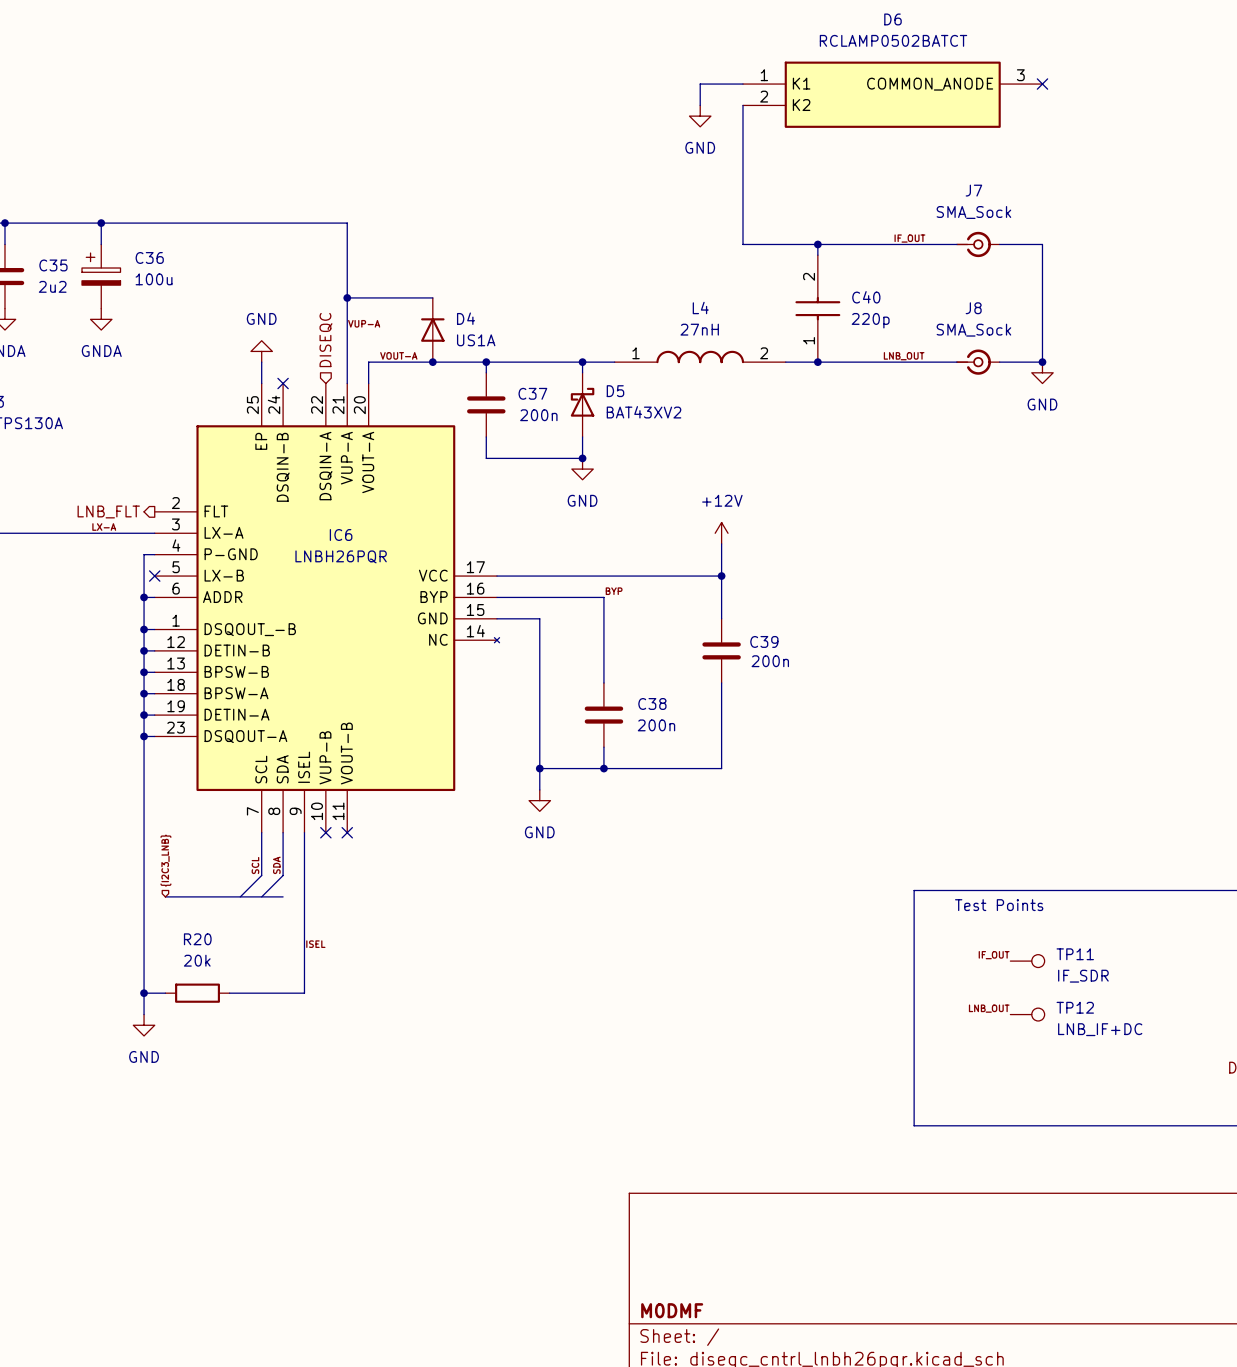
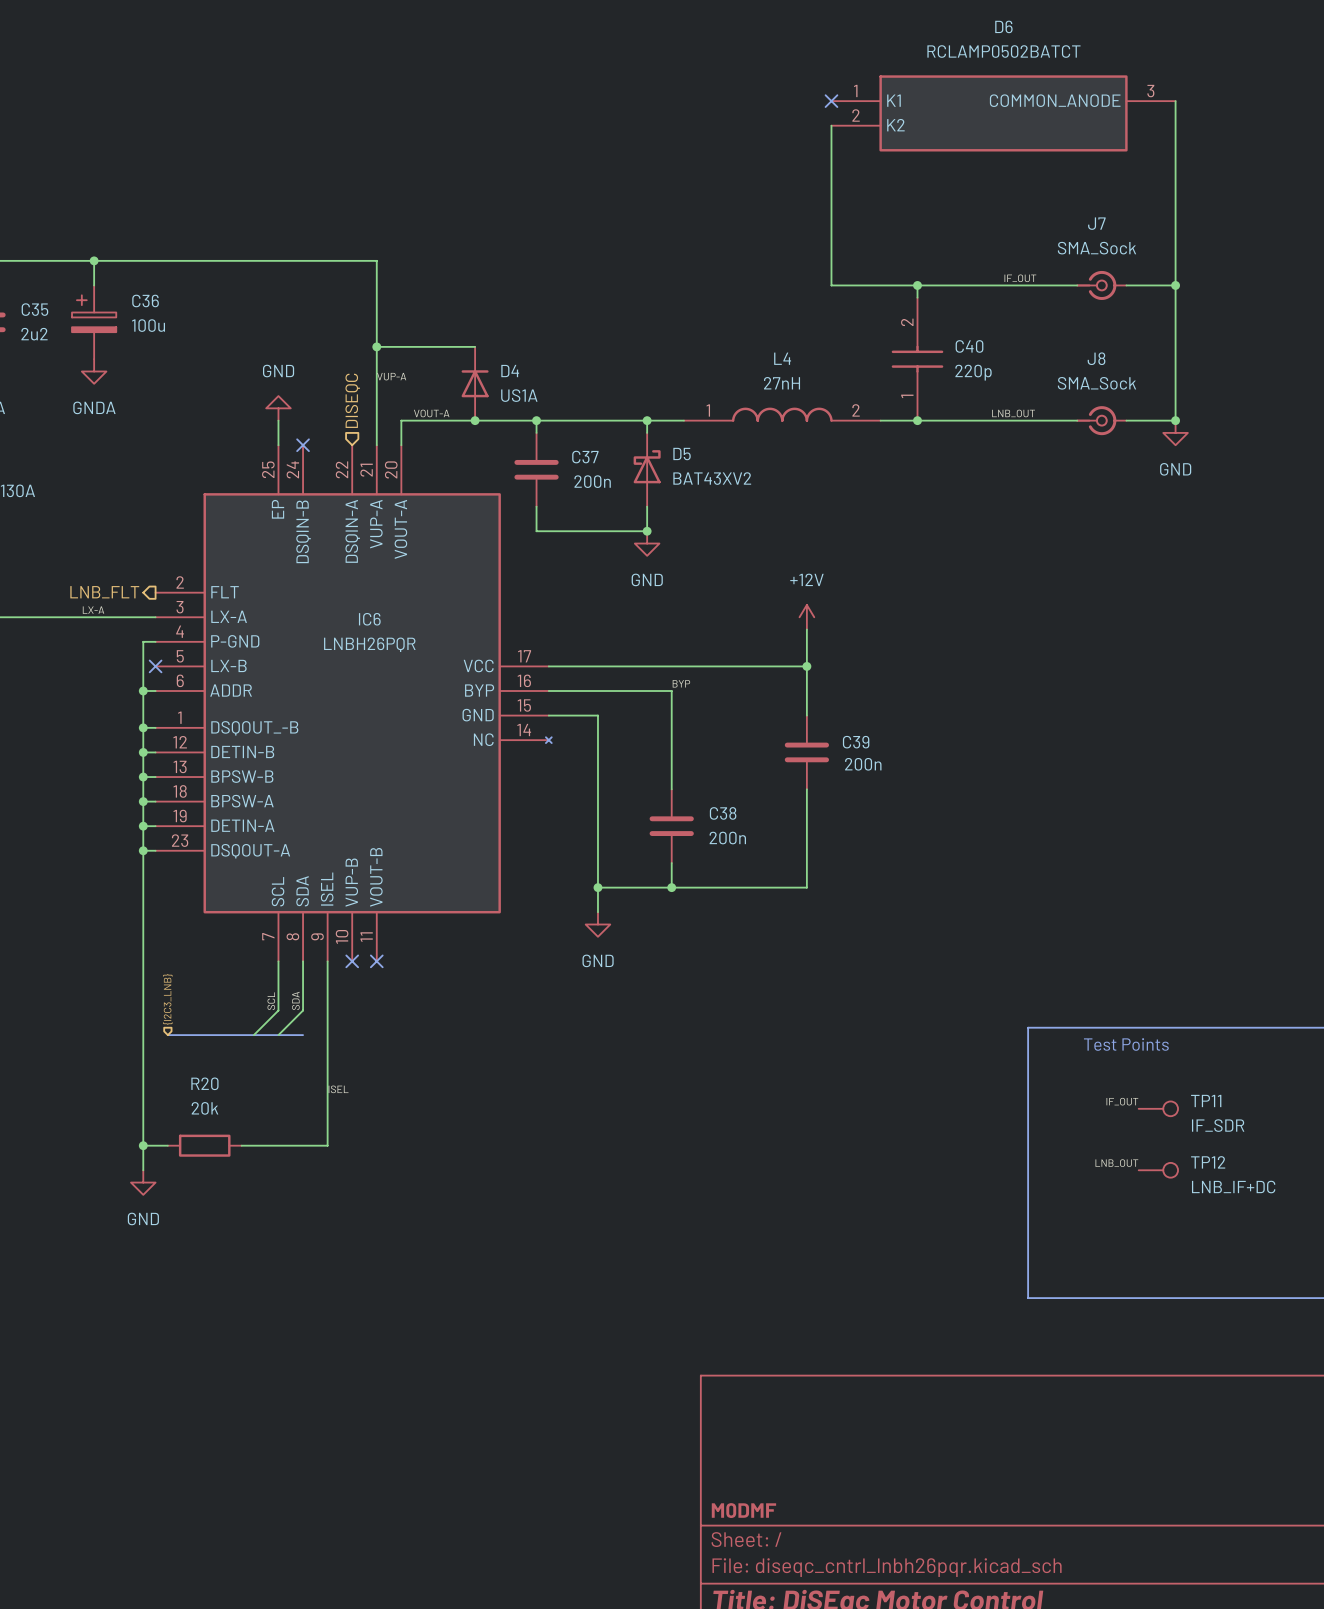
wire: (742, 84) (700, 84) (700, 105) -> none
no-connect mark: none -> (831, 101)
wire: none -> (1175, 101) (1175, 285)
no-connect mark: (1042, 84) -> none
power symbol: GND (700, 116) -> none
junction: none -> (1175, 285)

